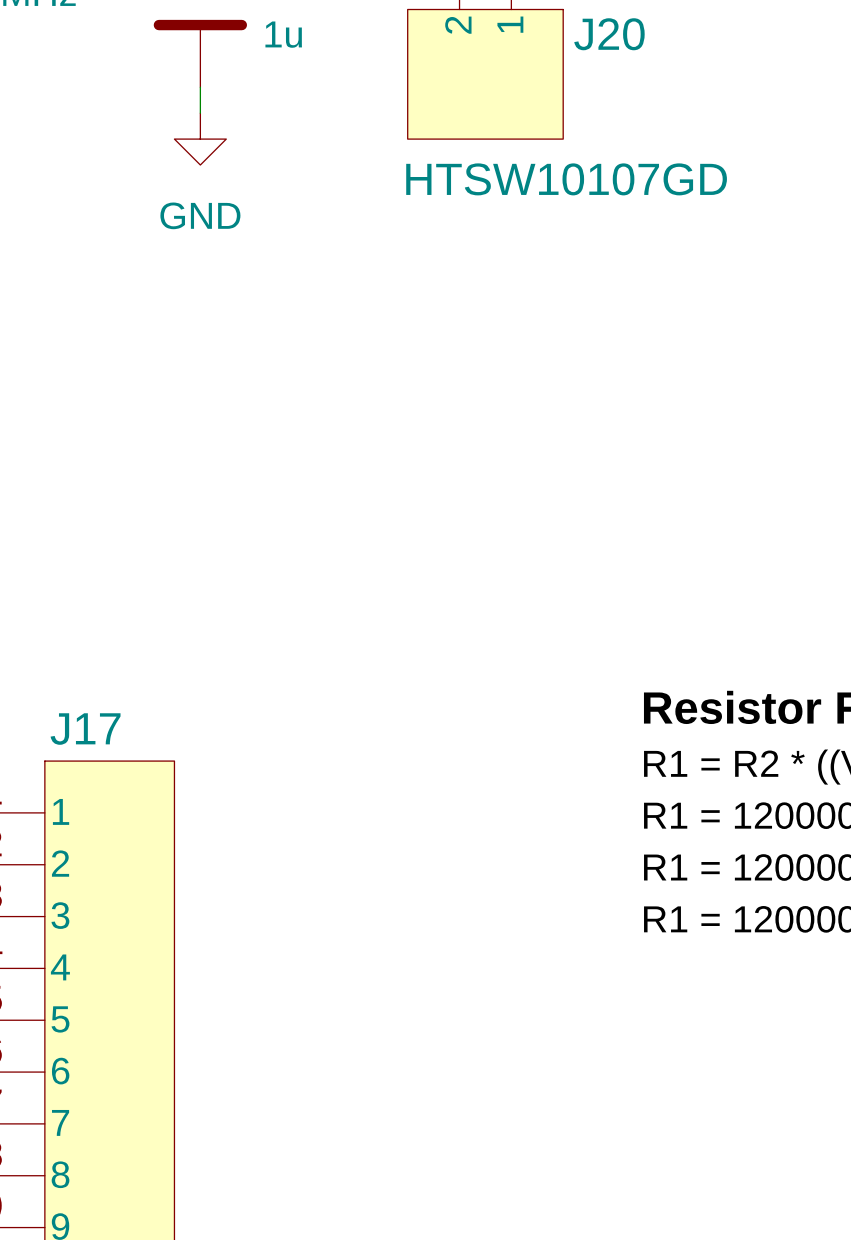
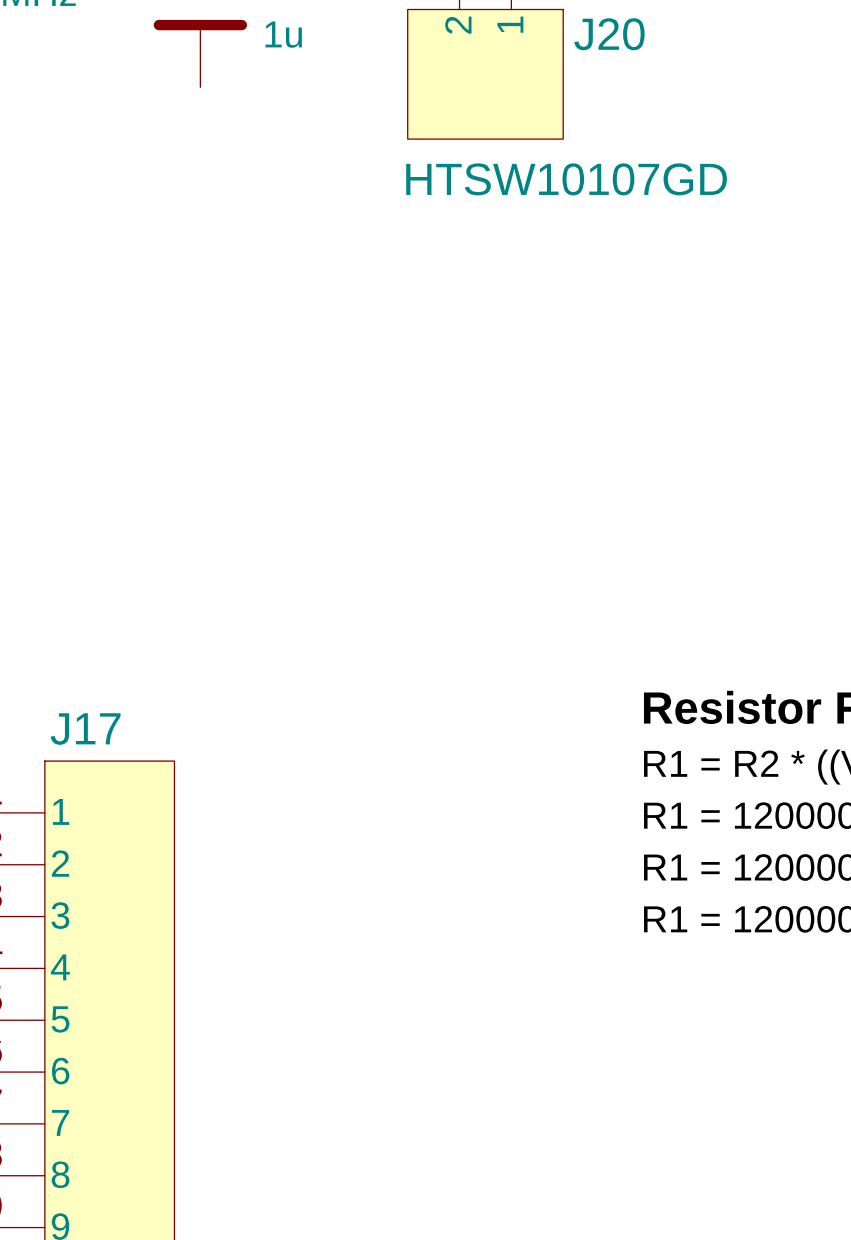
wire: (200, 87) (200, 113) -> none
power symbol: GND (200, 139) -> none

